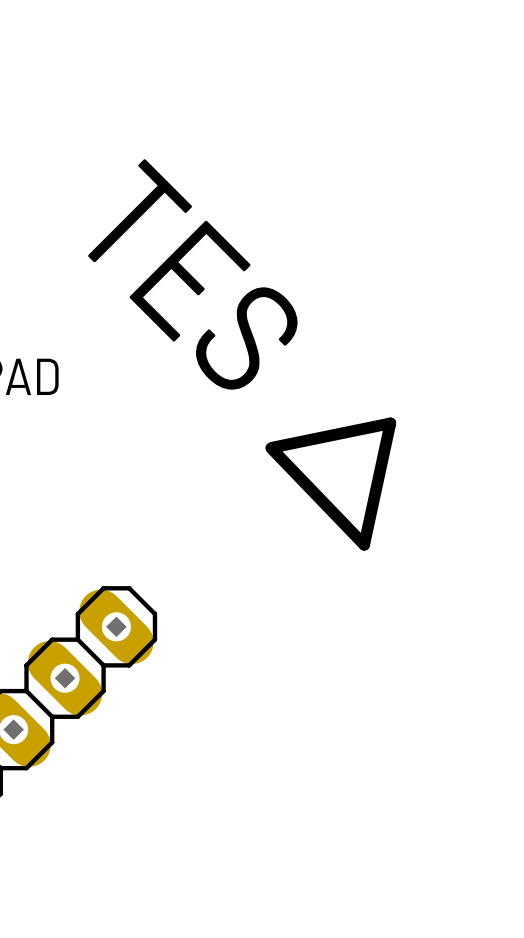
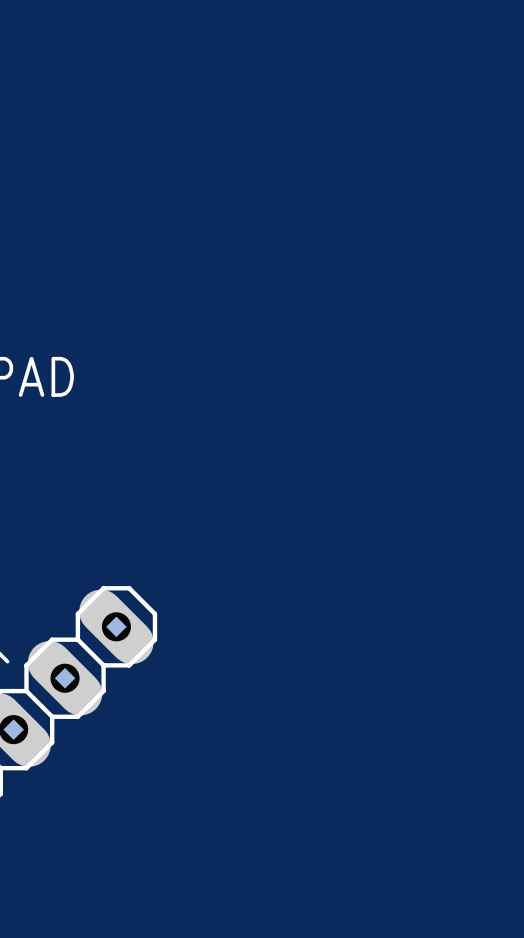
text: TES (192, 274) -> none
line: (273, 447) (390, 423) (364, 544) (271, 448) -> none

